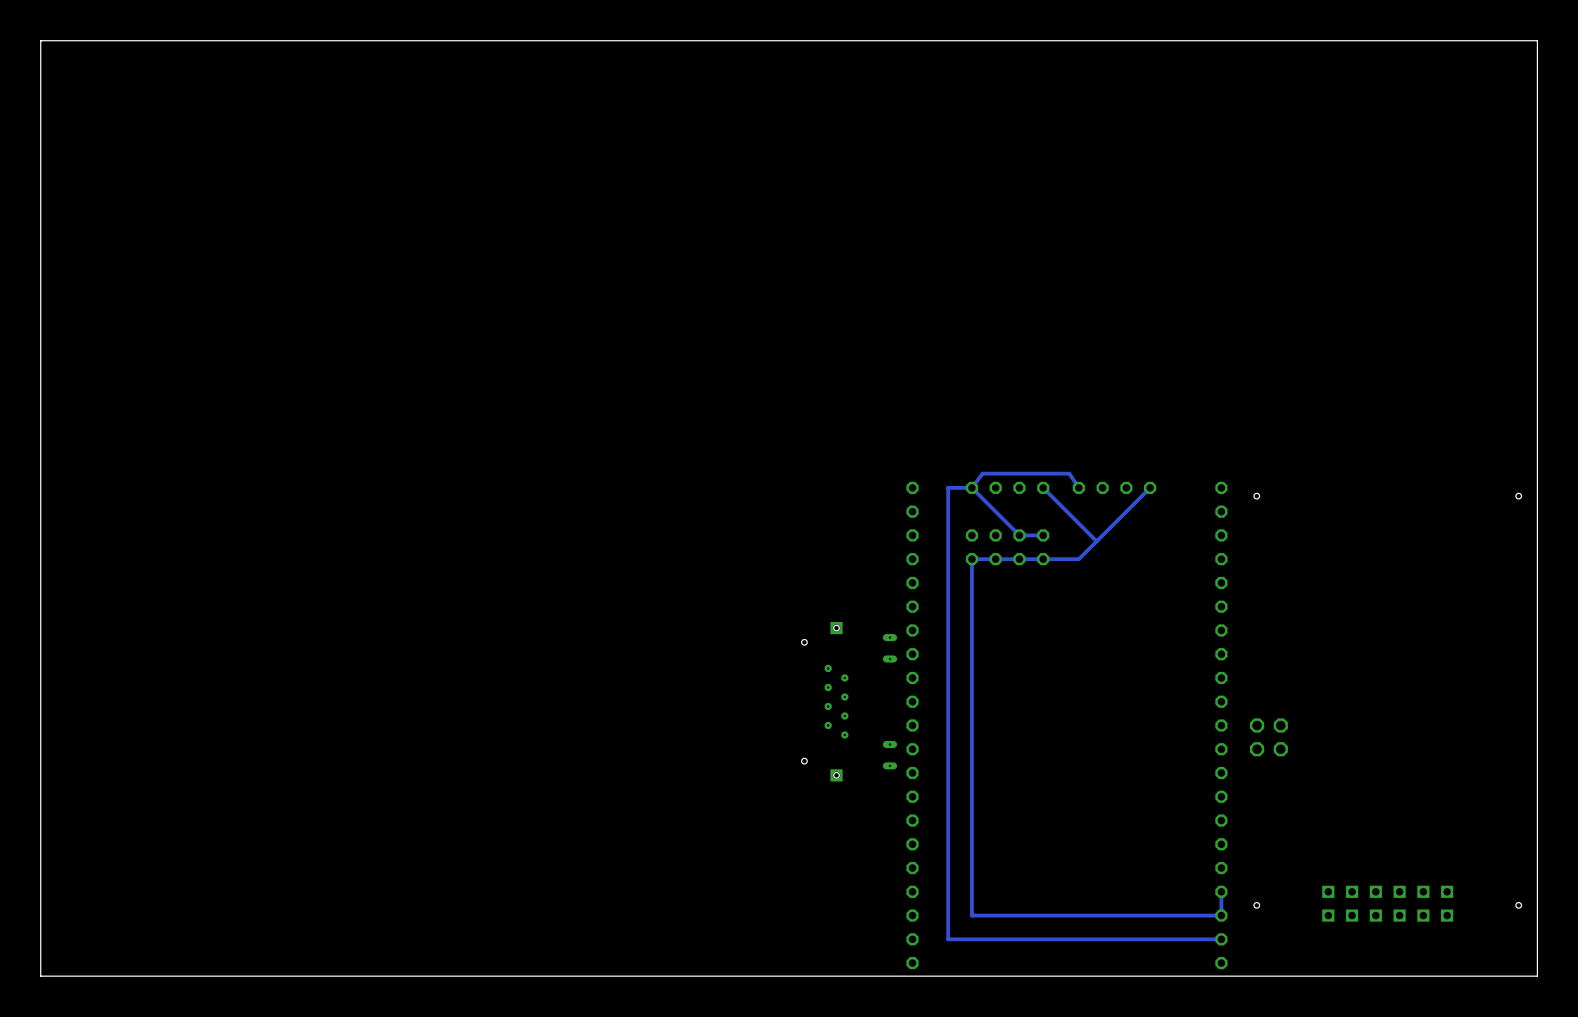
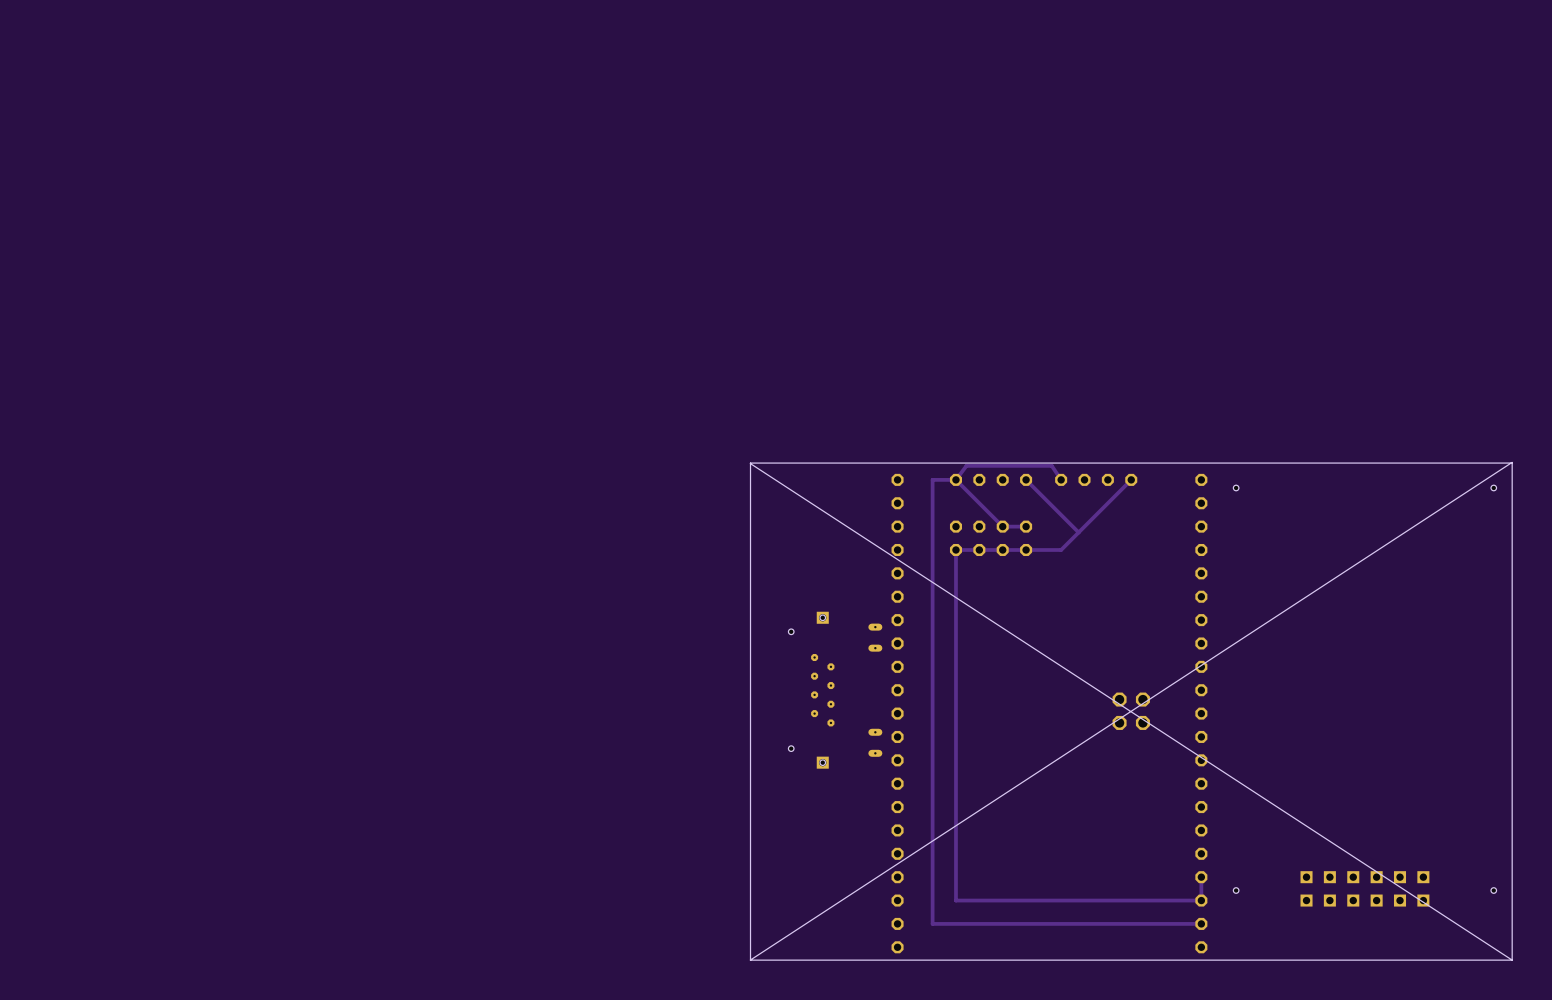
board edge: (1537, 470) (1537, 40) (40, 40) (40, 976) (763, 976) -> (1512, 463) (750, 463) (750, 960)
board edge: none -> (1512, 462) (750, 960)
board edge: none -> (750, 463) (1512, 960)
part position: (1268, 737) -> (1131, 711)

